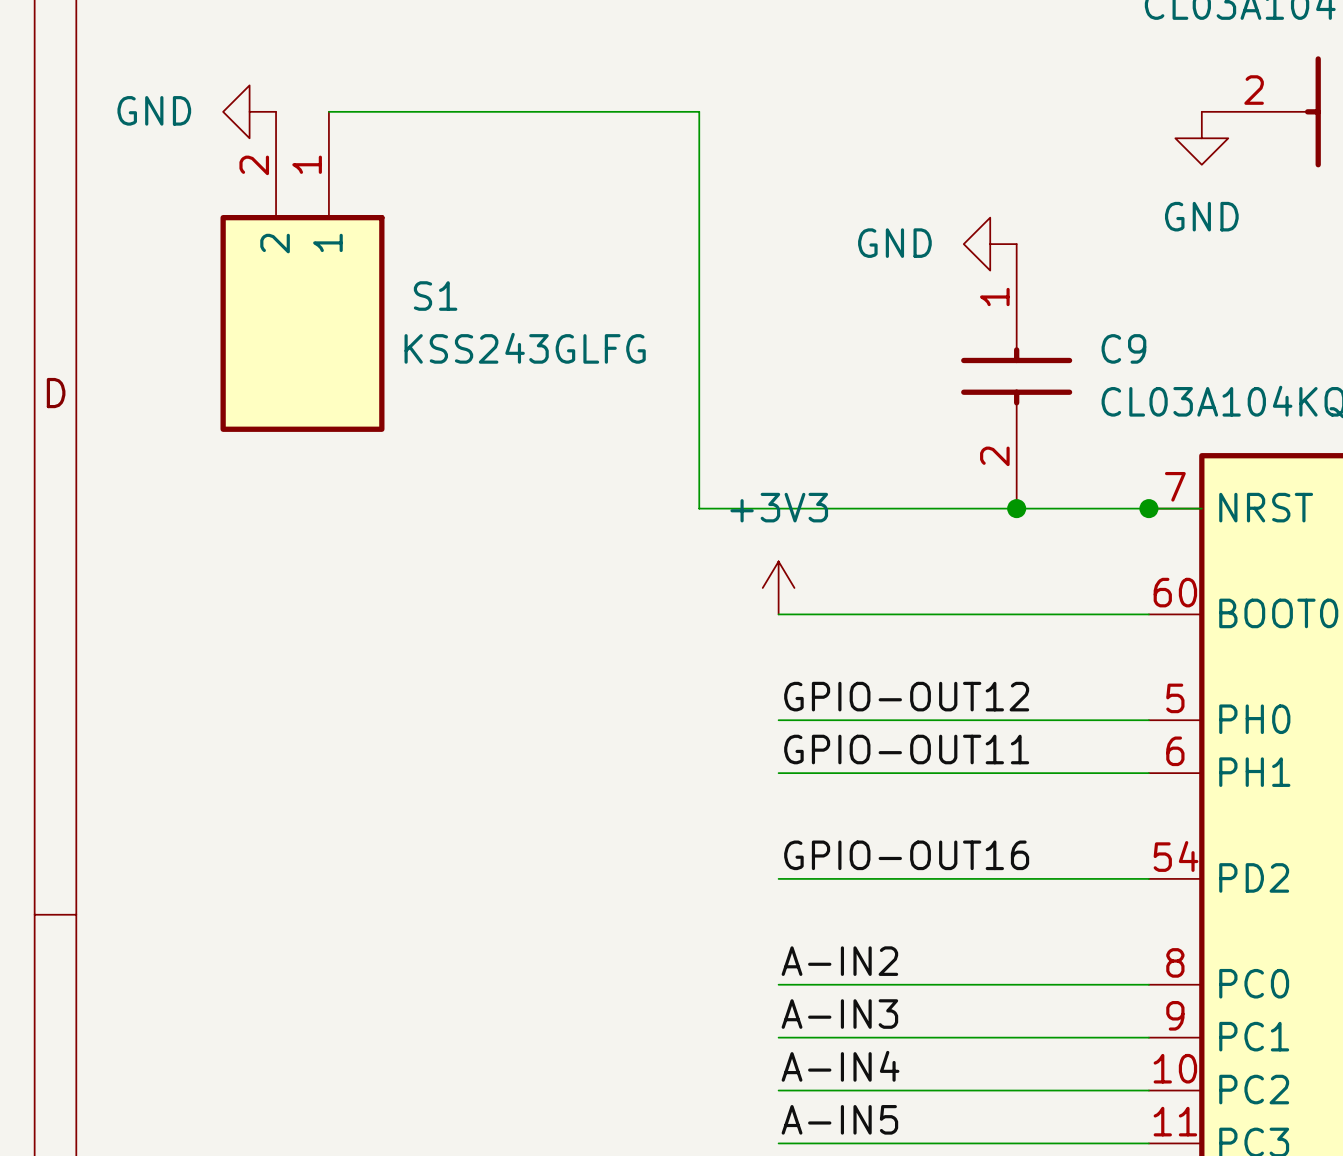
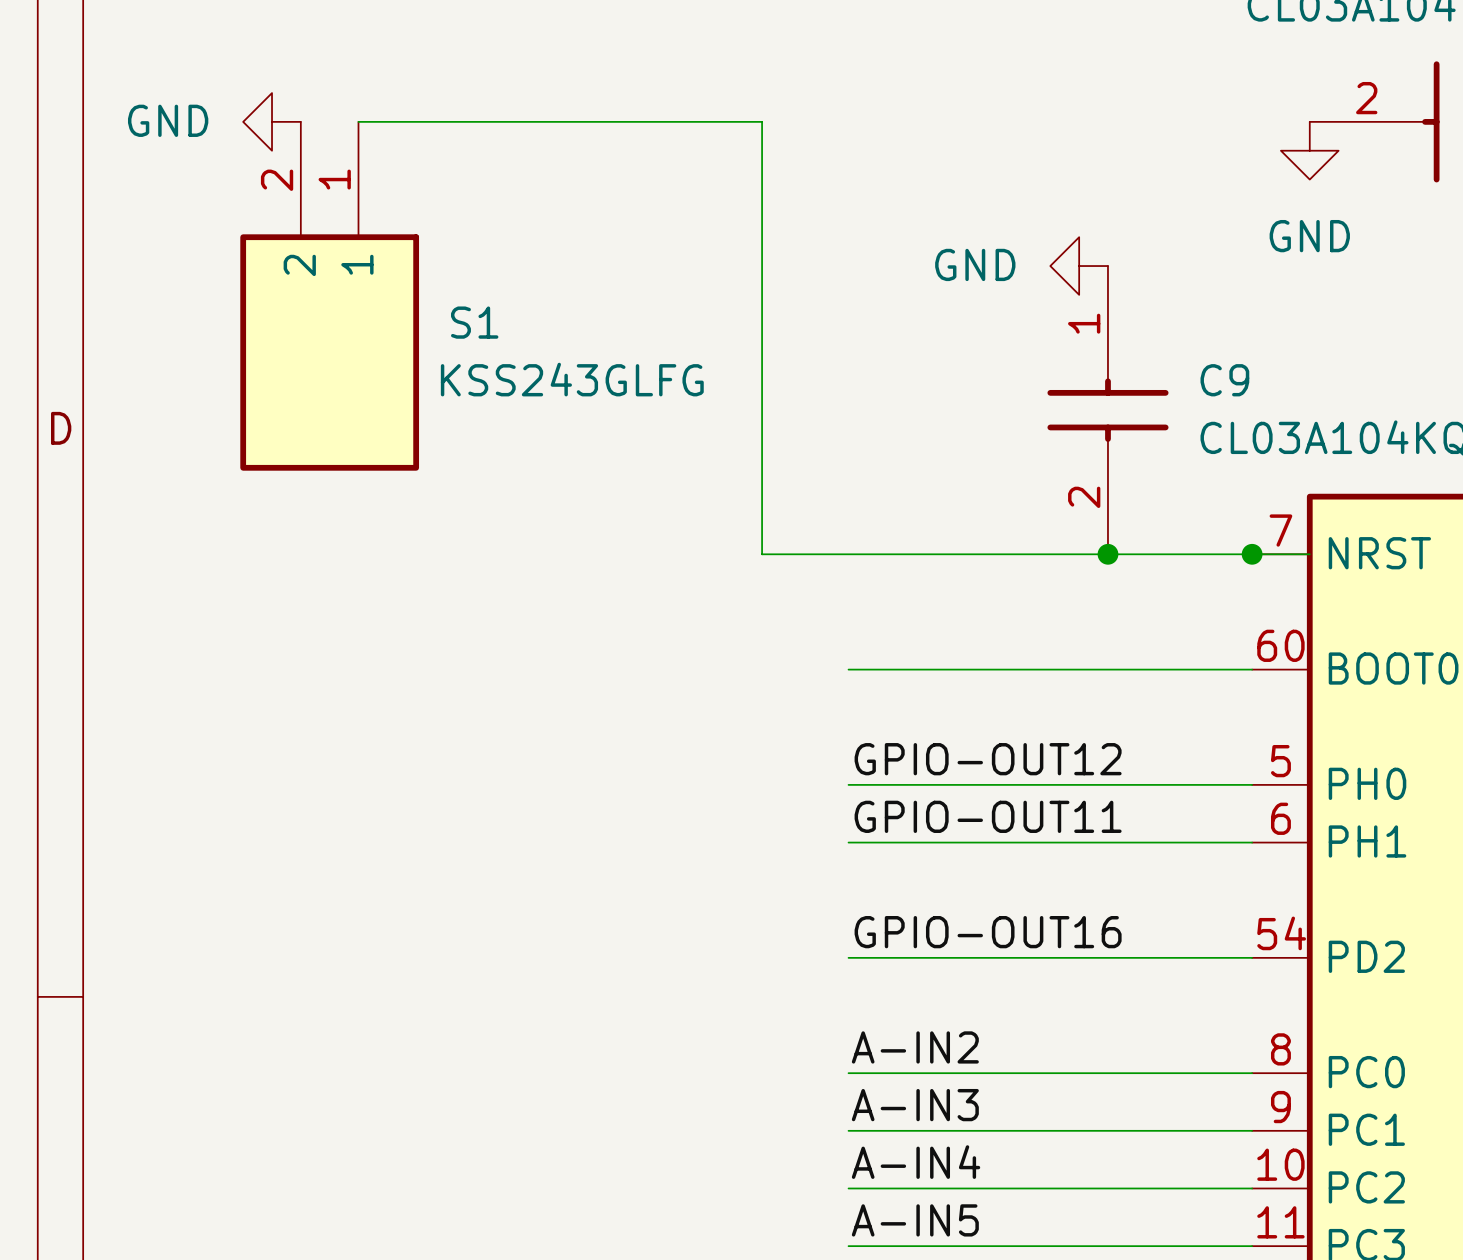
power symbol: +3V3 (778, 587) -> none

